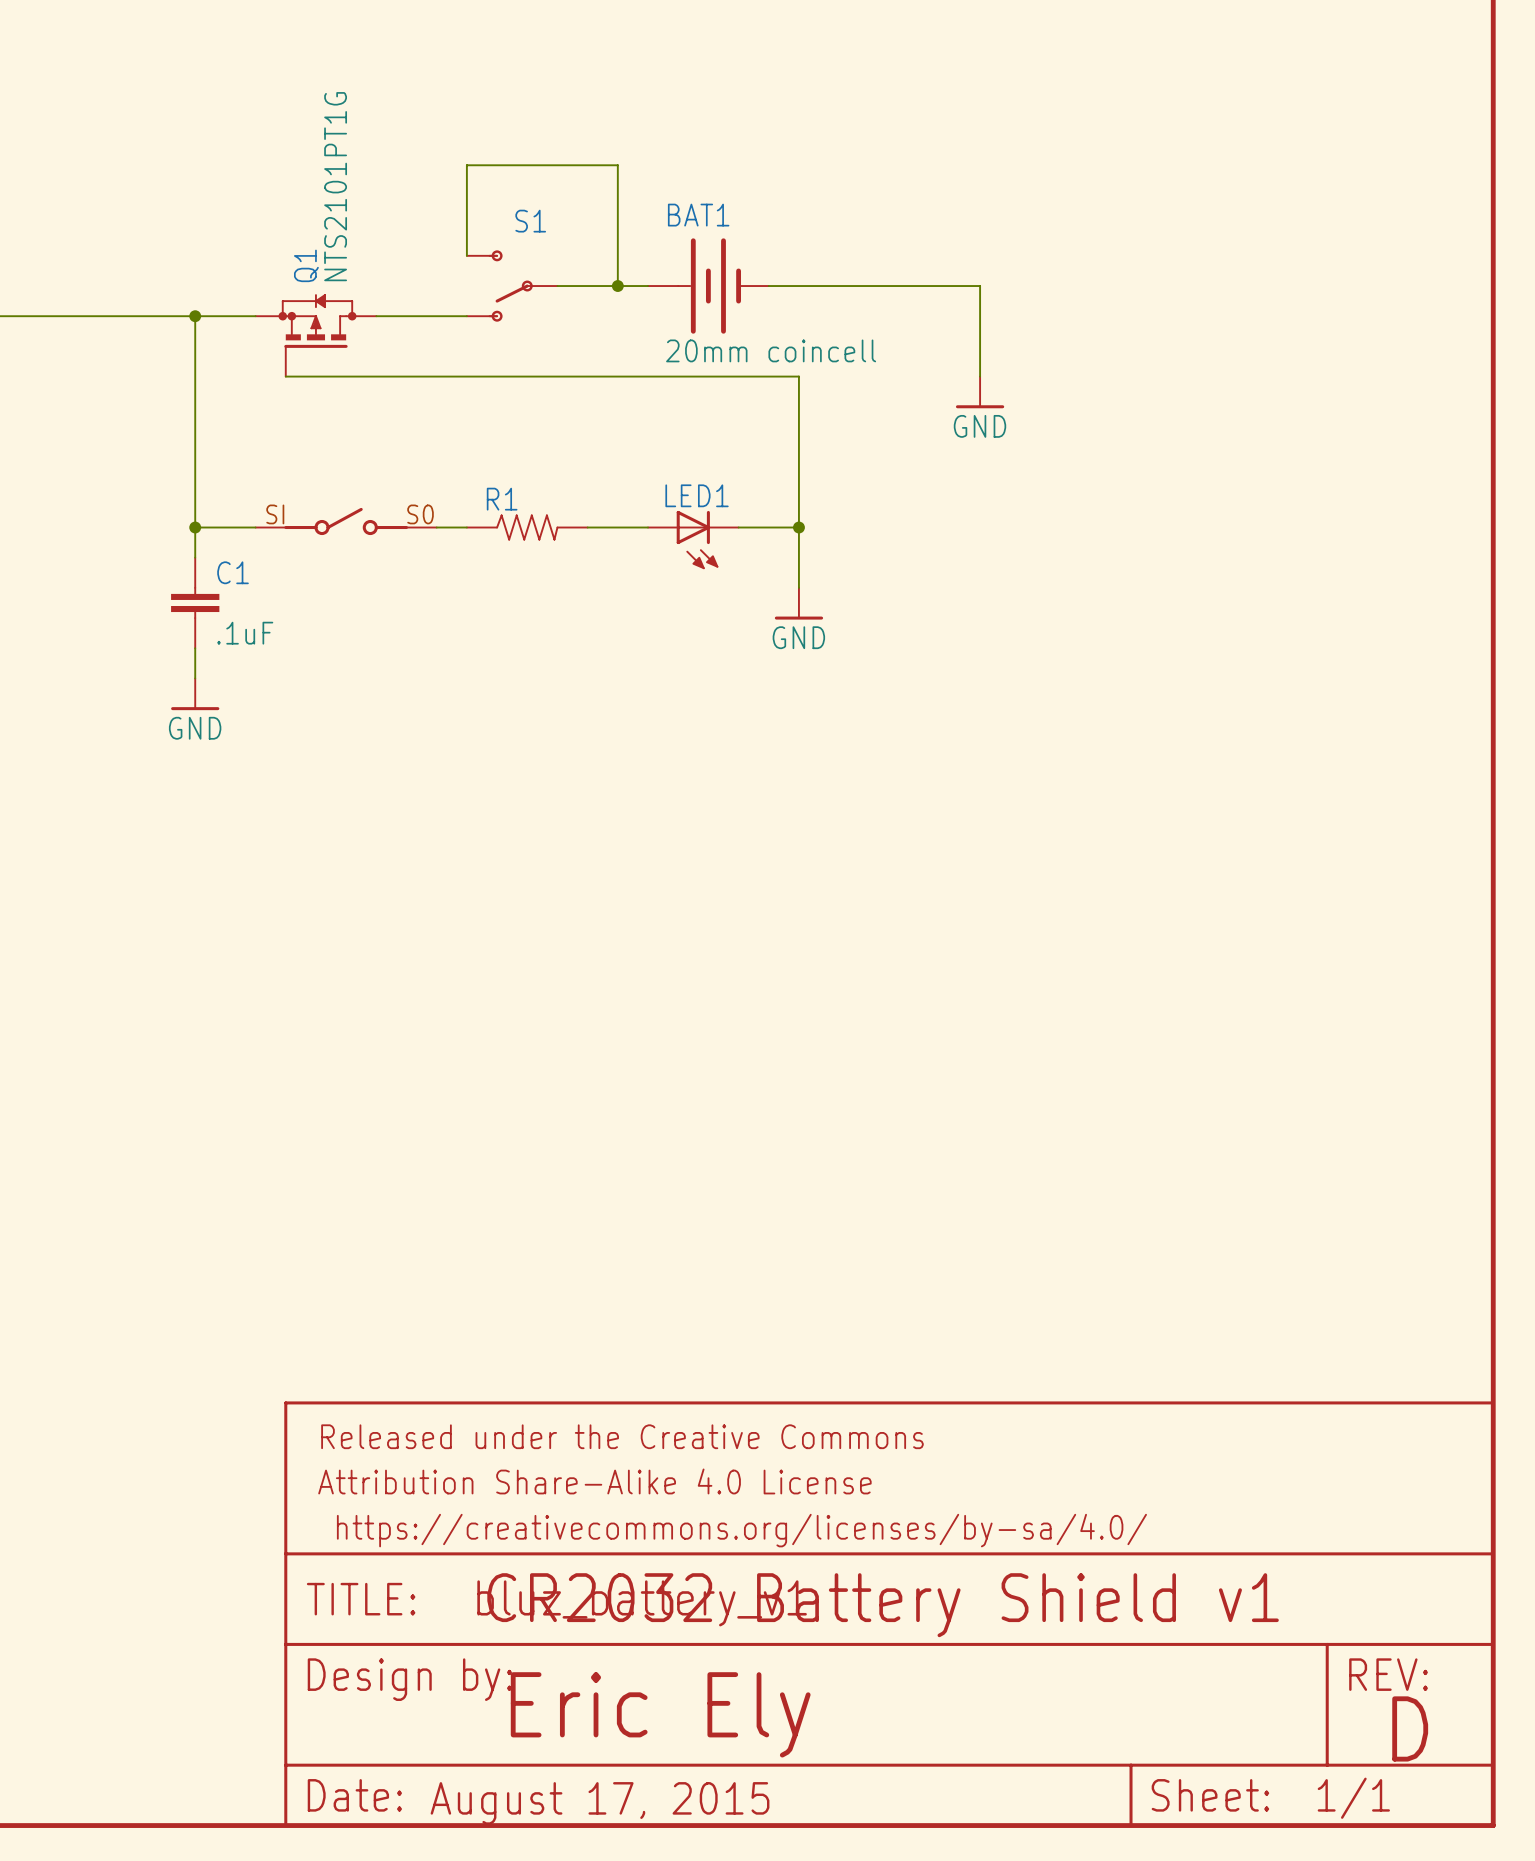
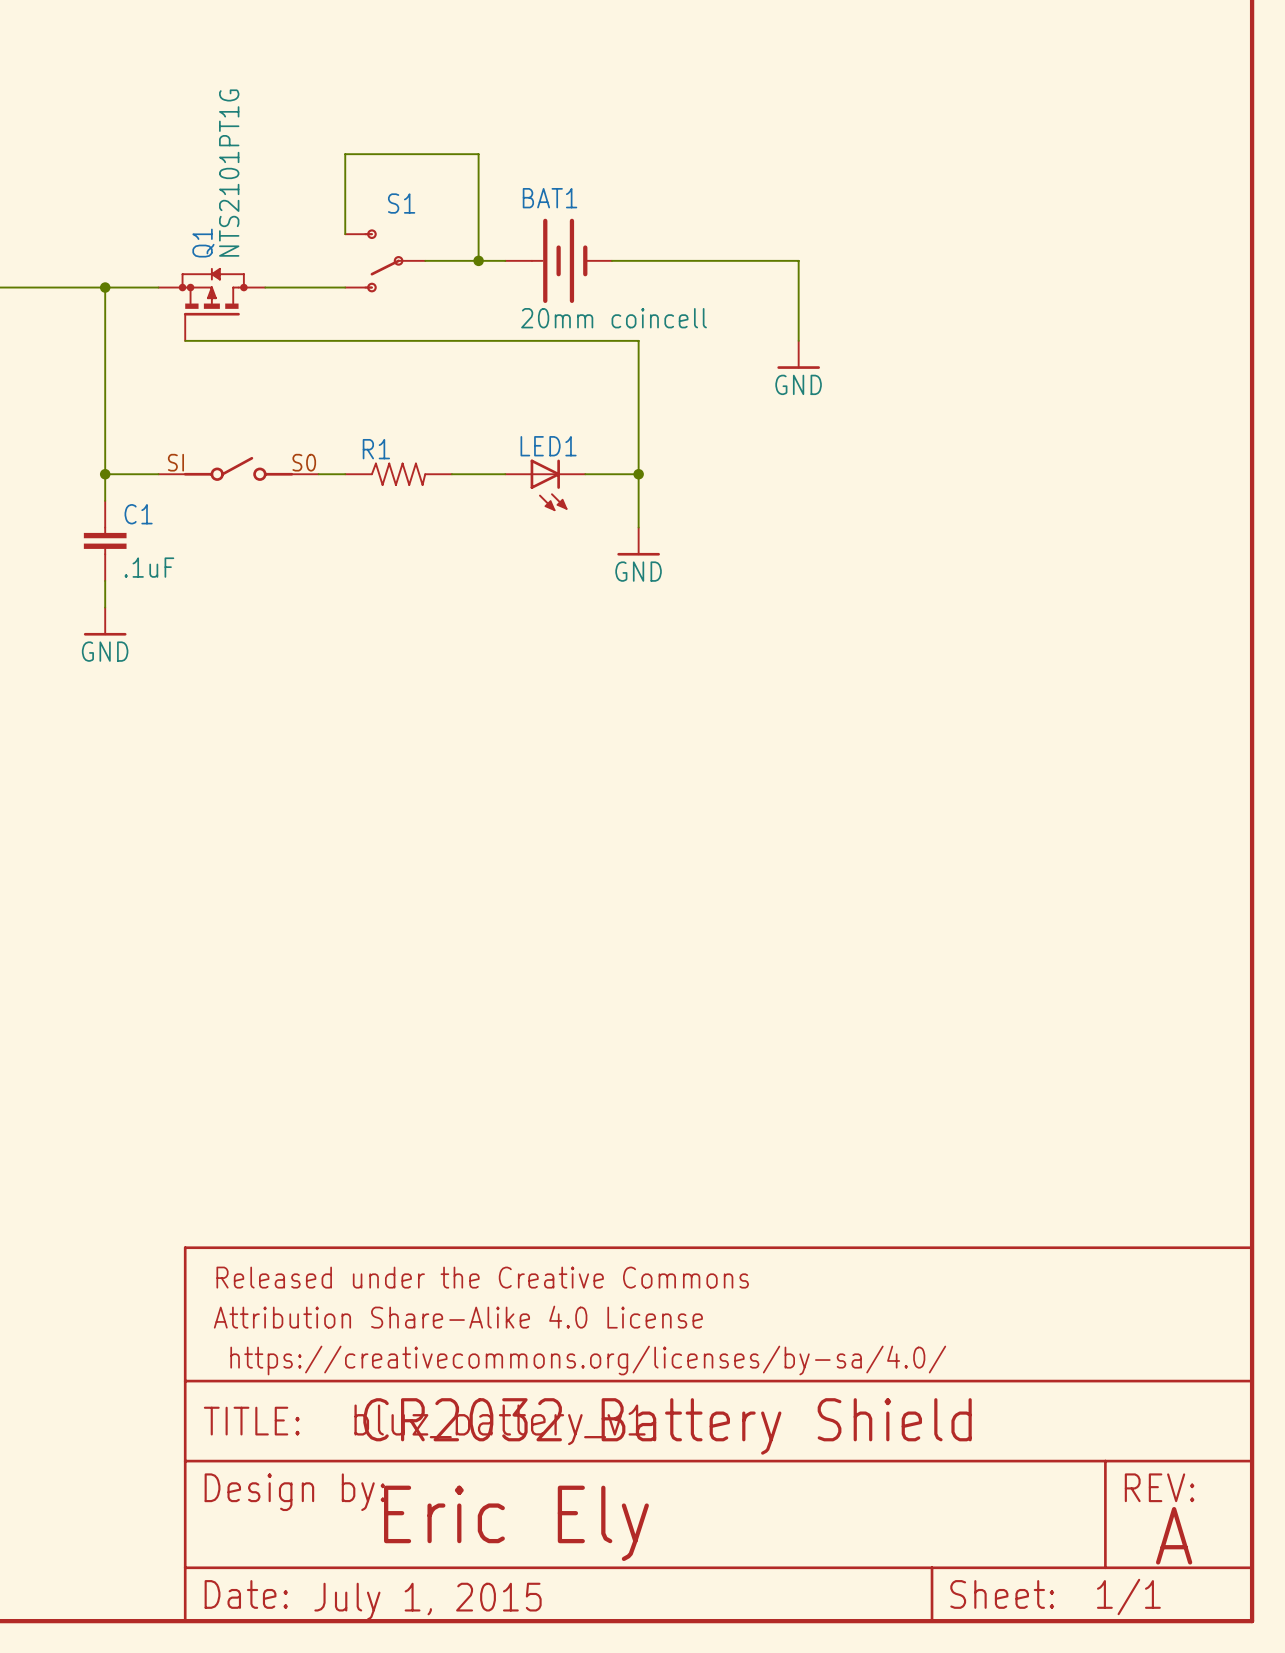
text: CR2032 Battery Shield v1 (883, 1605) -> CR2032 Battery Shield (667, 1426)
text: D (1410, 1728) -> A (1174, 1535)
text: August 17, 2015 (600, 1803) -> July 1, 2015 (428, 1601)

